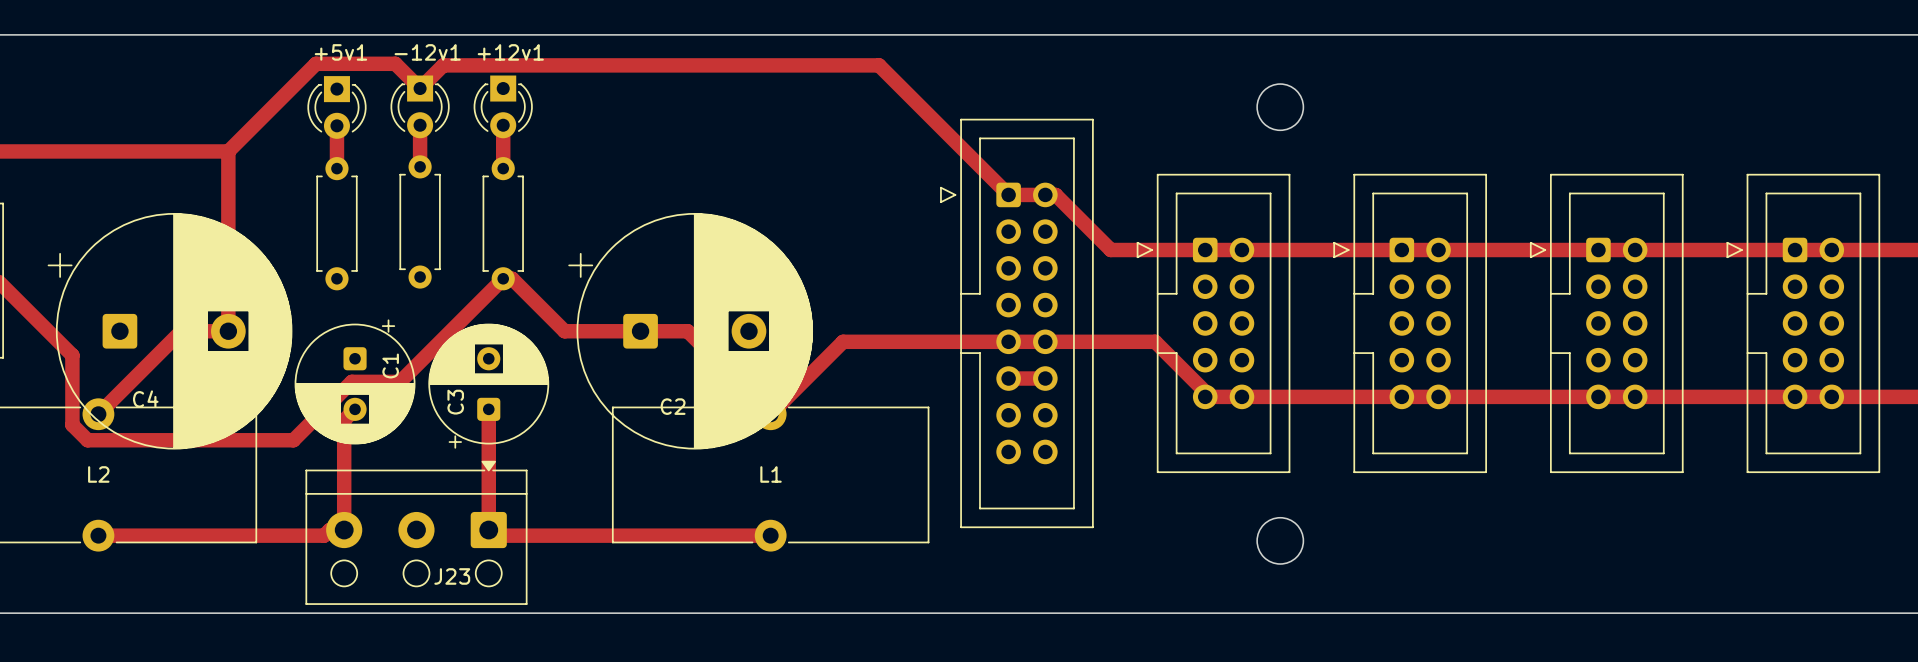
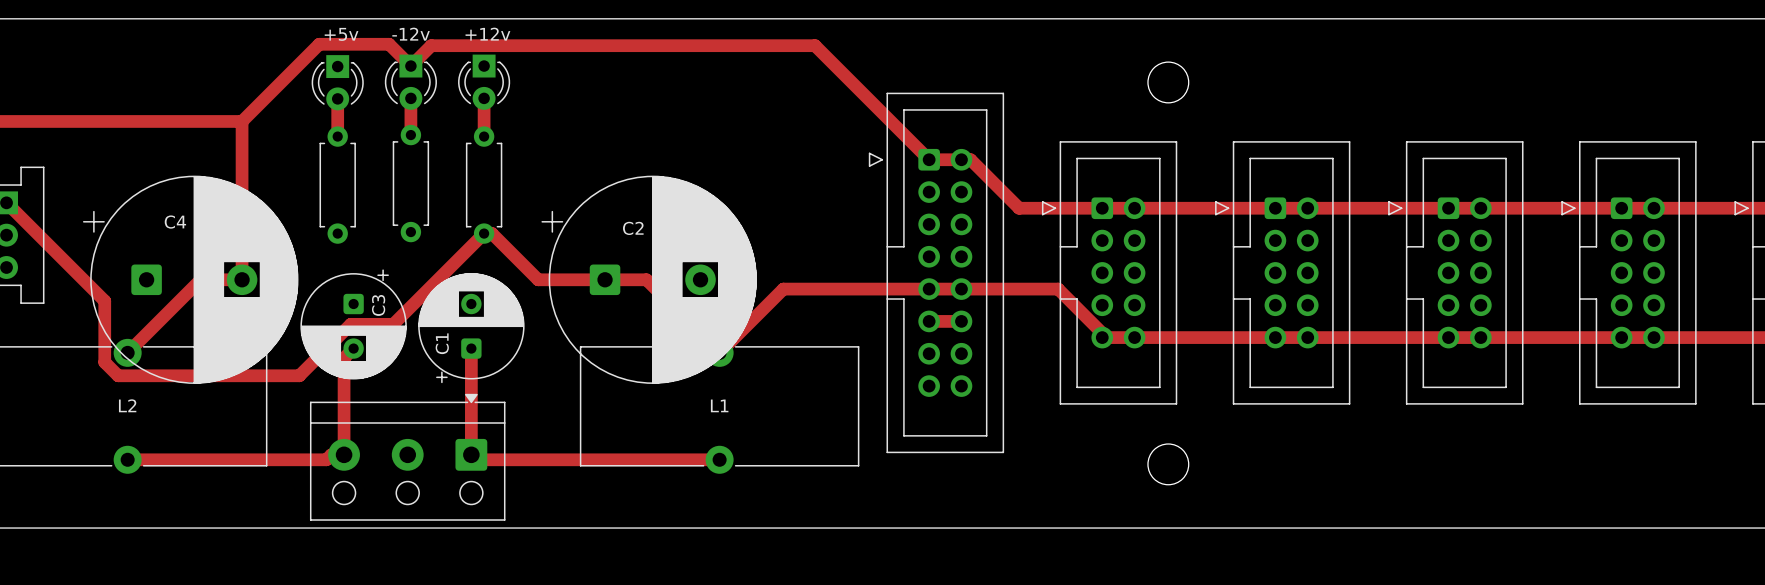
+5v1 name: +5v1 (340, 52) -> +5v (341, 34)
-12v1 name: -12v1 (427, 52) -> -12v (411, 34)
+12v1 name: +12v1 (510, 52) -> +12v (487, 34)
C1 name position: C1 (390, 365) -> C1 (442, 343)
C4 name position: C4 (145, 399) -> C4 (175, 222)
C3 name position: C3 (455, 402) -> C3 (378, 305)
C2 name position: C2 (673, 406) -> C2 (633, 228)
J23 name: J23 (452, 576) -> none

